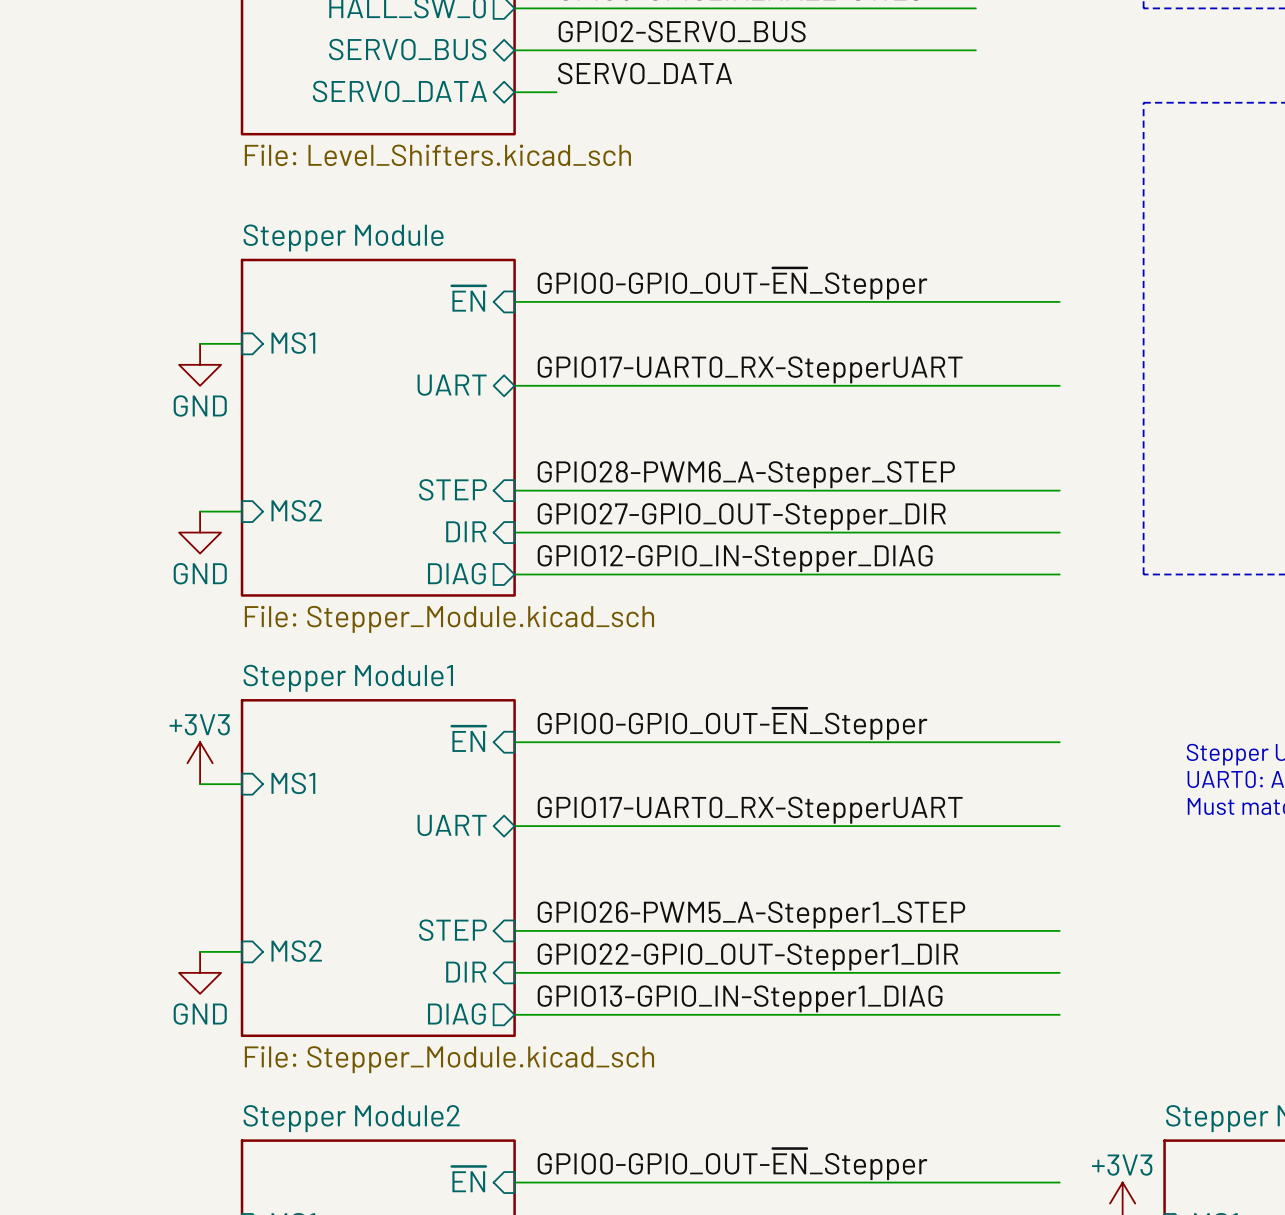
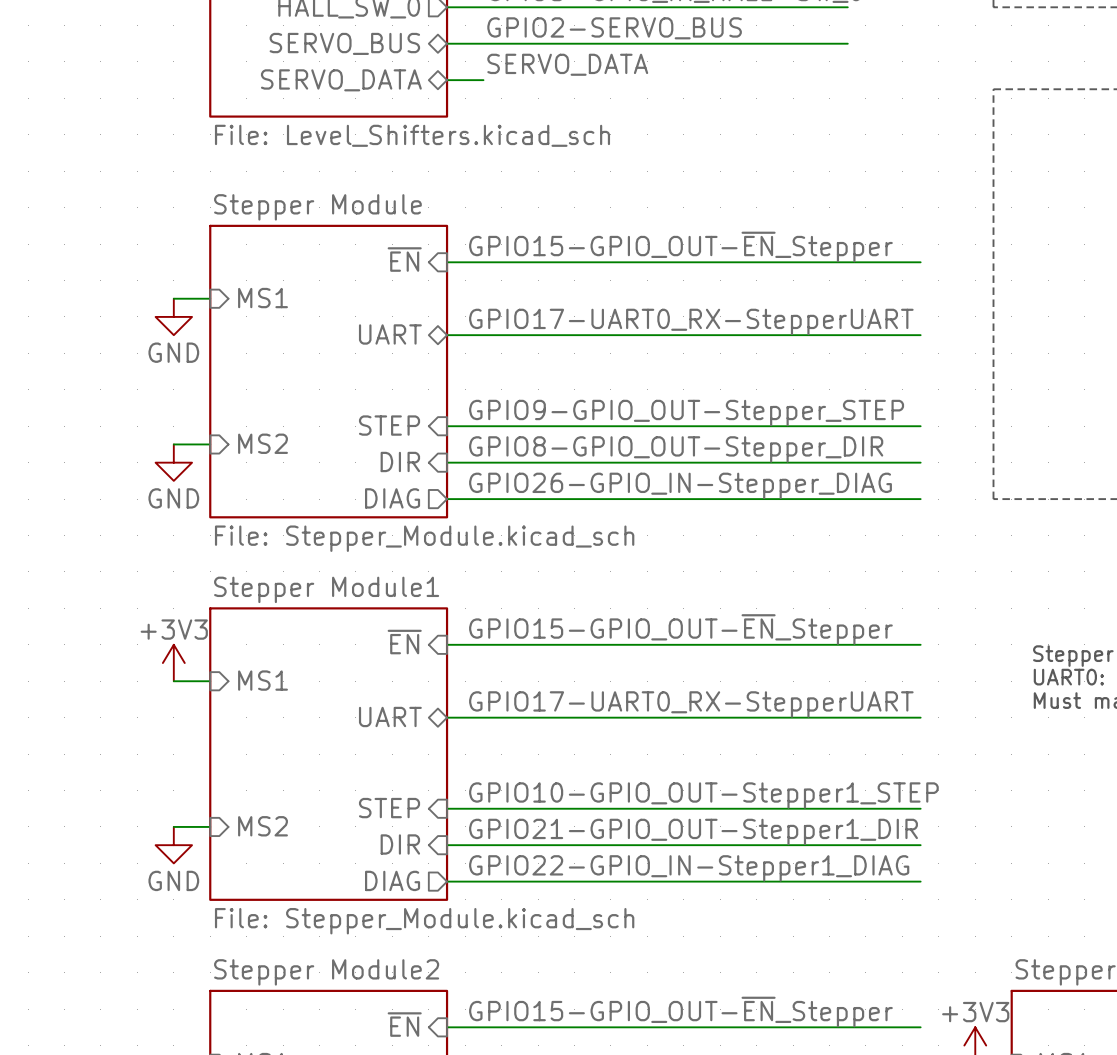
label: GPIO0-GPIO_OUT-~{EN}_Stepper (732, 283) -> GPIO15-GPIO_OUT-~{EN}_Stepper (680, 246)
label: GPIO28-PWM6_A-Stepper_STEP (746, 474) -> GPIO9-GPIO_OUT-Stepper_STEP (686, 413)
label: GPIO27-GPIO_OUT-Stepper_DIR (741, 516) -> GPIO8-GPIO_OUT-Stepper_DIR (676, 449)
label: GPIO12-GPIO_IN-Stepper_DIAG (735, 558) -> GPIO26-GPIO_IN-Stepper_DIAG (680, 485)
label: GPIO0-GPIO_OUT-~{EN}_Stepper (732, 724) -> GPIO15-GPIO_OUT-~{EN}_Stepper (680, 629)
label: GPIO26-PWM5_A-Stepper1_STEP (751, 915) -> GPIO10-GPIO_OUT-Stepper1_STEP (703, 795)
label: GPIO22-GPIO_OUT-Stepper1_DIR (747, 956) -> GPIO21-GPIO_OUT-Stepper1_DIR (693, 831)
label: GPIO13-GPIO_IN-Stepper1_DIAG (740, 998) -> GPIO22-GPIO_IN-Stepper1_DIAG (689, 868)
label: GPIO0-GPIO_OUT-~{EN}_Stepper (732, 1164) -> GPIO15-GPIO_OUT-~{EN}_Stepper (680, 1012)

